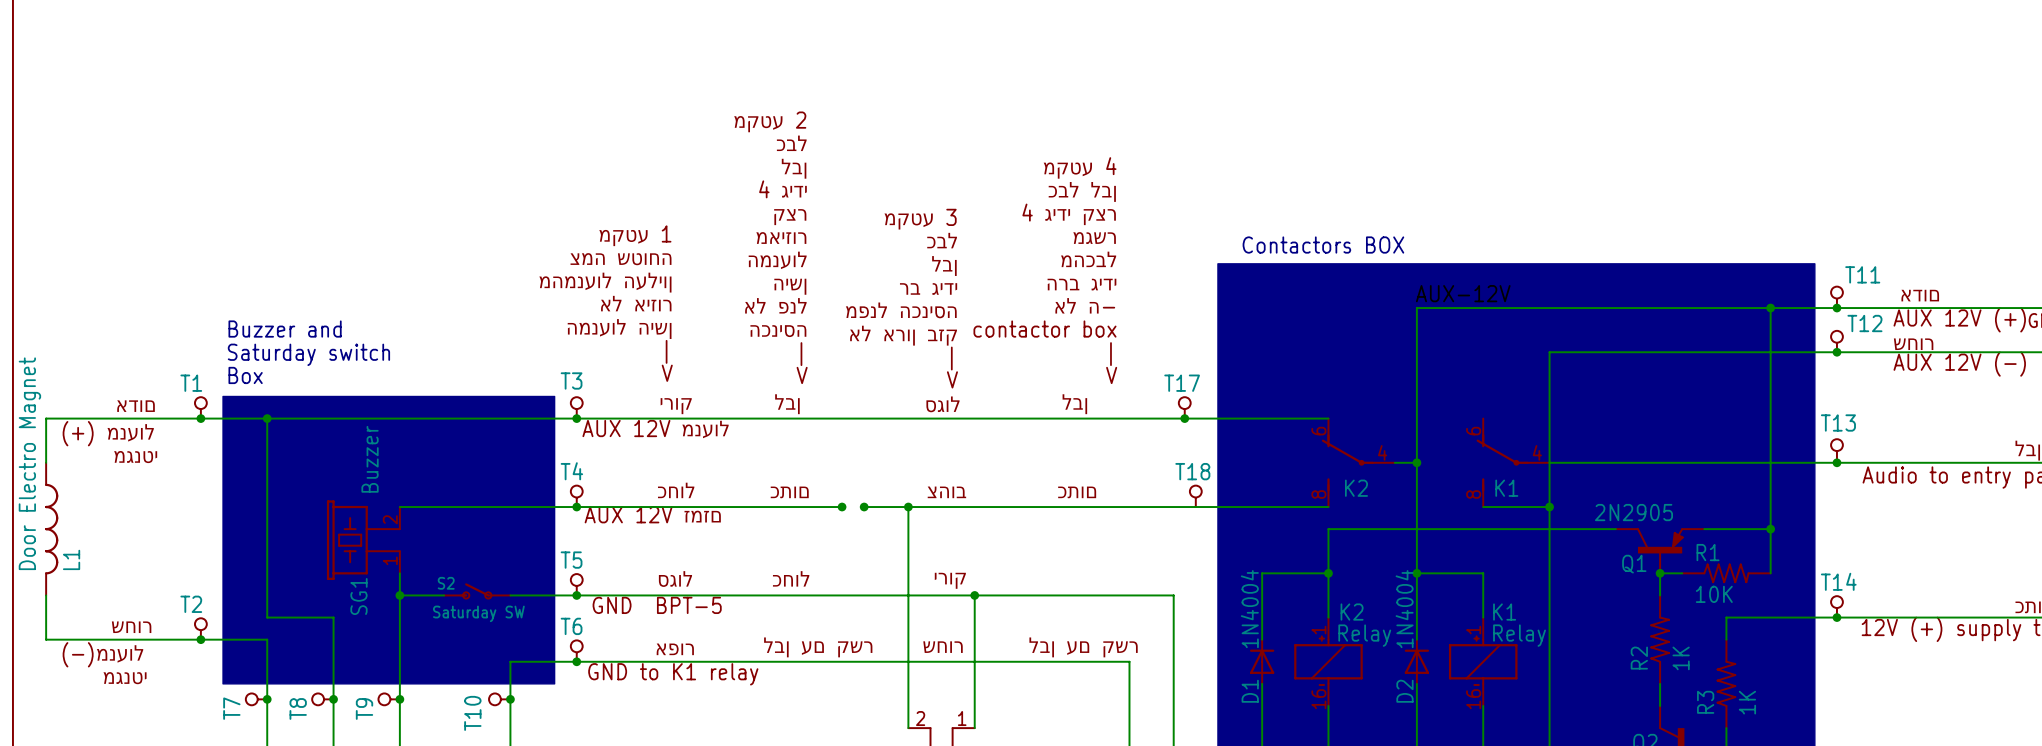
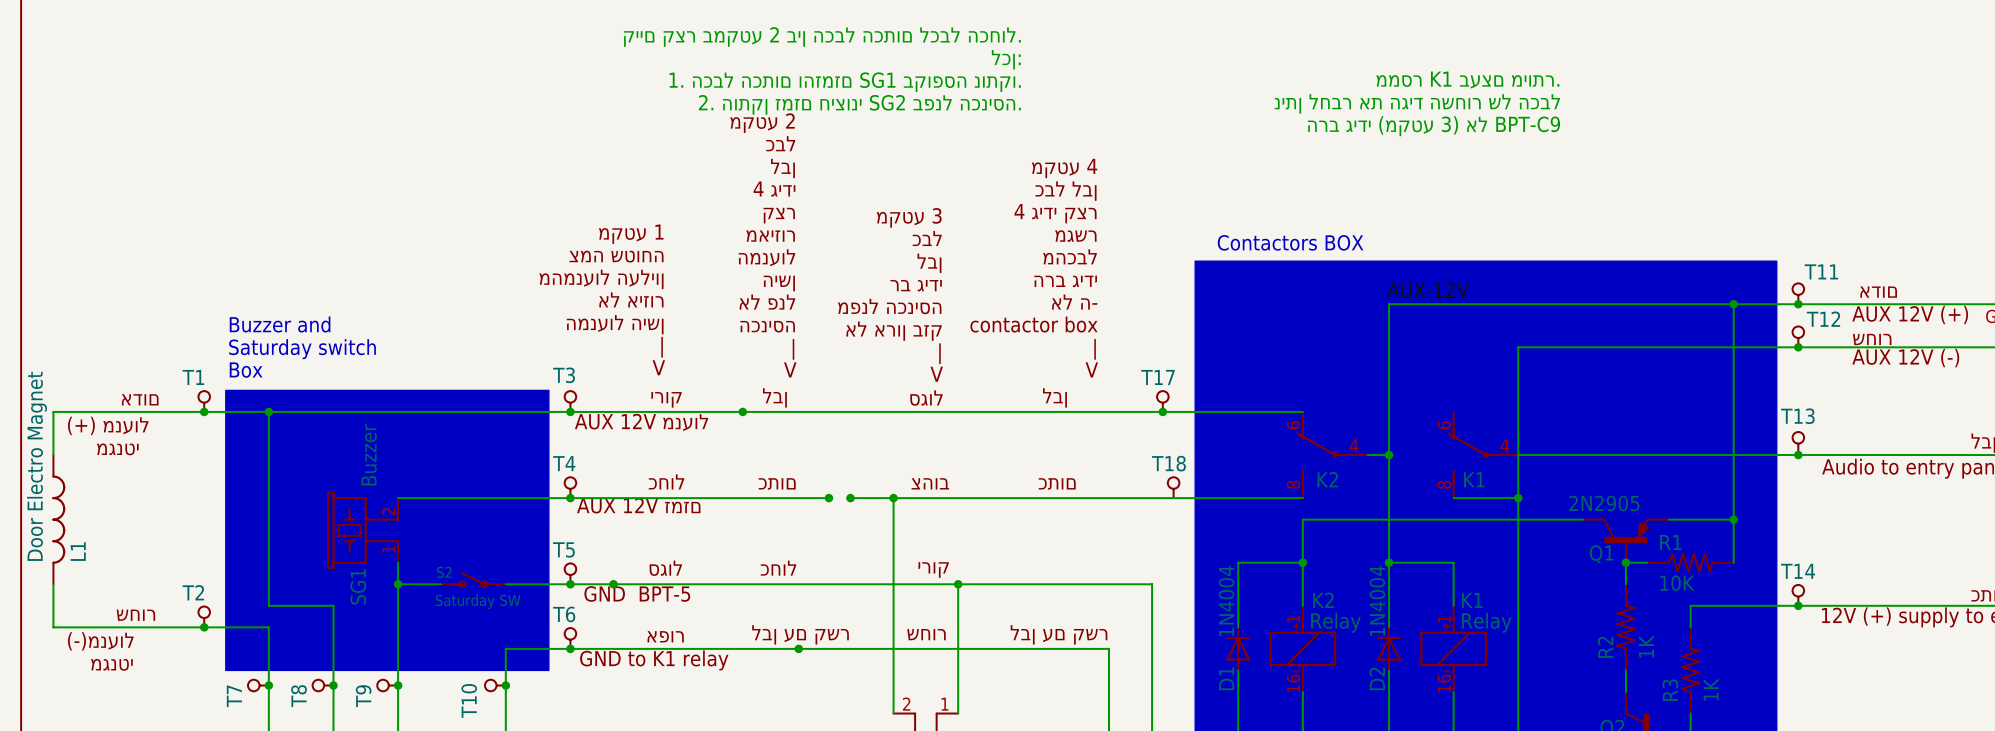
text: none -> קיים קצר במקטע 2 בין הכבל הכתום לכבל הכחול. (822, 36)
text: none -> לכן: (1006, 59)
text: none -> ממסר K1 בעצם מיותר. (1467, 80)
text: none -> 1. הכבל הכתום והזמזם SG1 בקופסה נותקו. (845, 82)
text: none -> ניתן לחבר את הגיד השחור של הכבל (1417, 103)
text: none -> 2. הותקן זמזם חיצוני SG2 בפנל הכניסה. (859, 104)
text: none -> הרב גידי (מקטע 3) אל BPT-C9 (1434, 126)
junction: none -> (742, 411)
junction: none -> (613, 584)
junction: none -> (798, 648)

